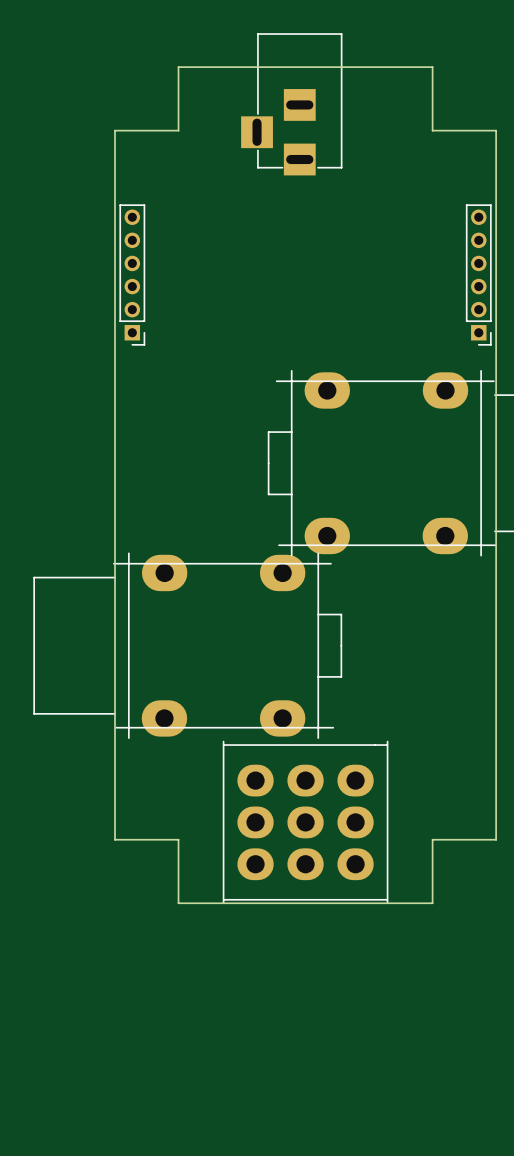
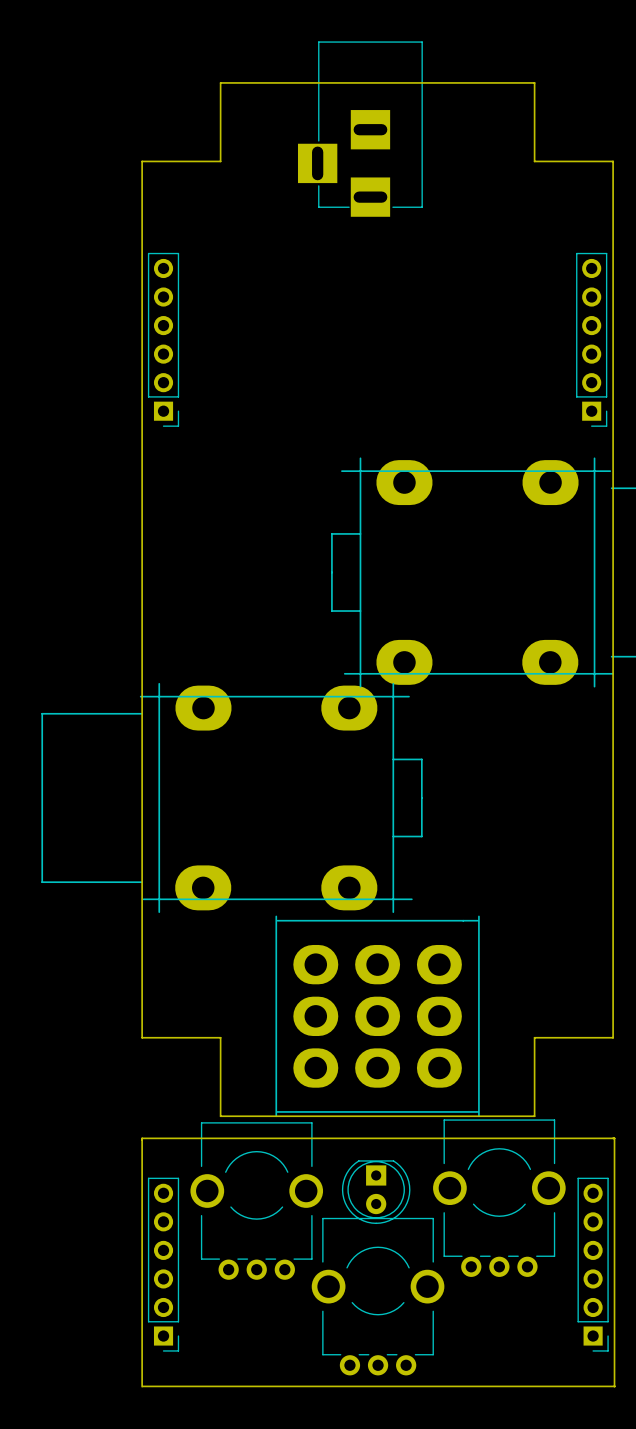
part: none -> (376, 1192)
part: none -> (499, 1198)
part: none -> (256, 1201)
part: none -> (163, 1264)
part: none -> (593, 1264)
part: none -> (378, 1296)
board edge: none -> (142, 1386) (615, 1386)
board edge: none -> (142, 1386) (142, 1138) (614, 1138) (614, 1386)

